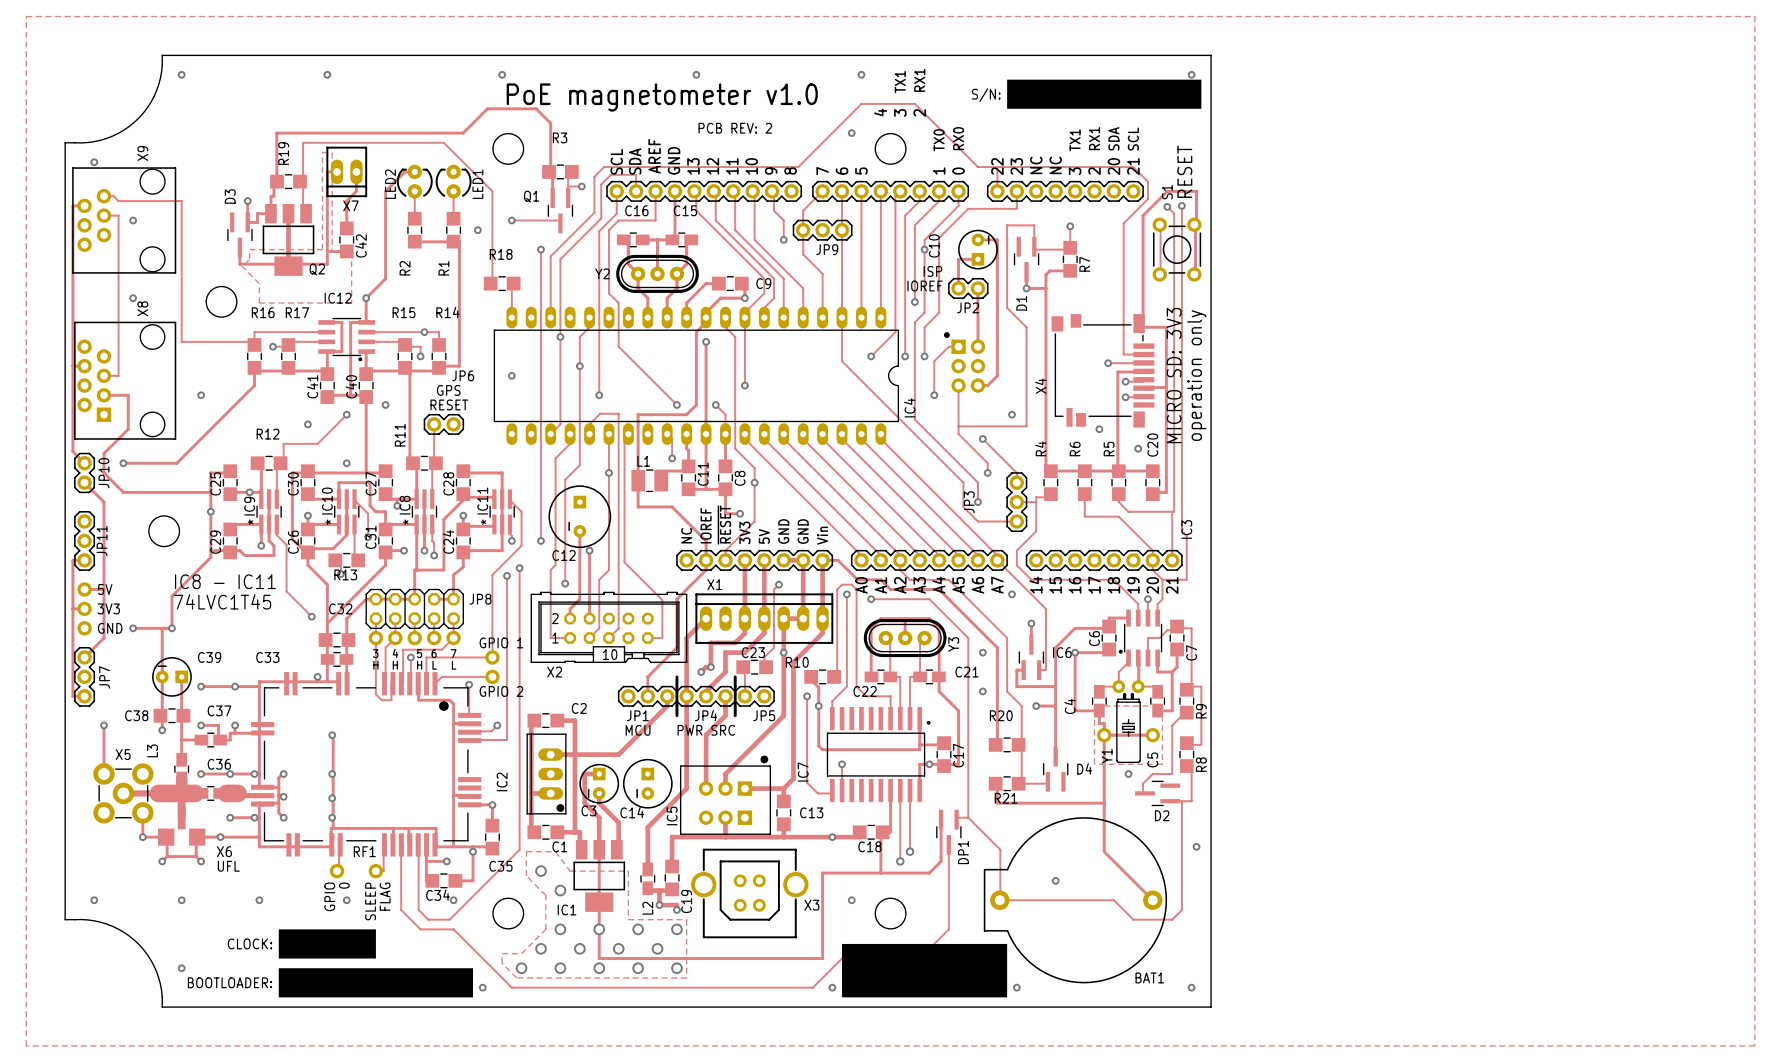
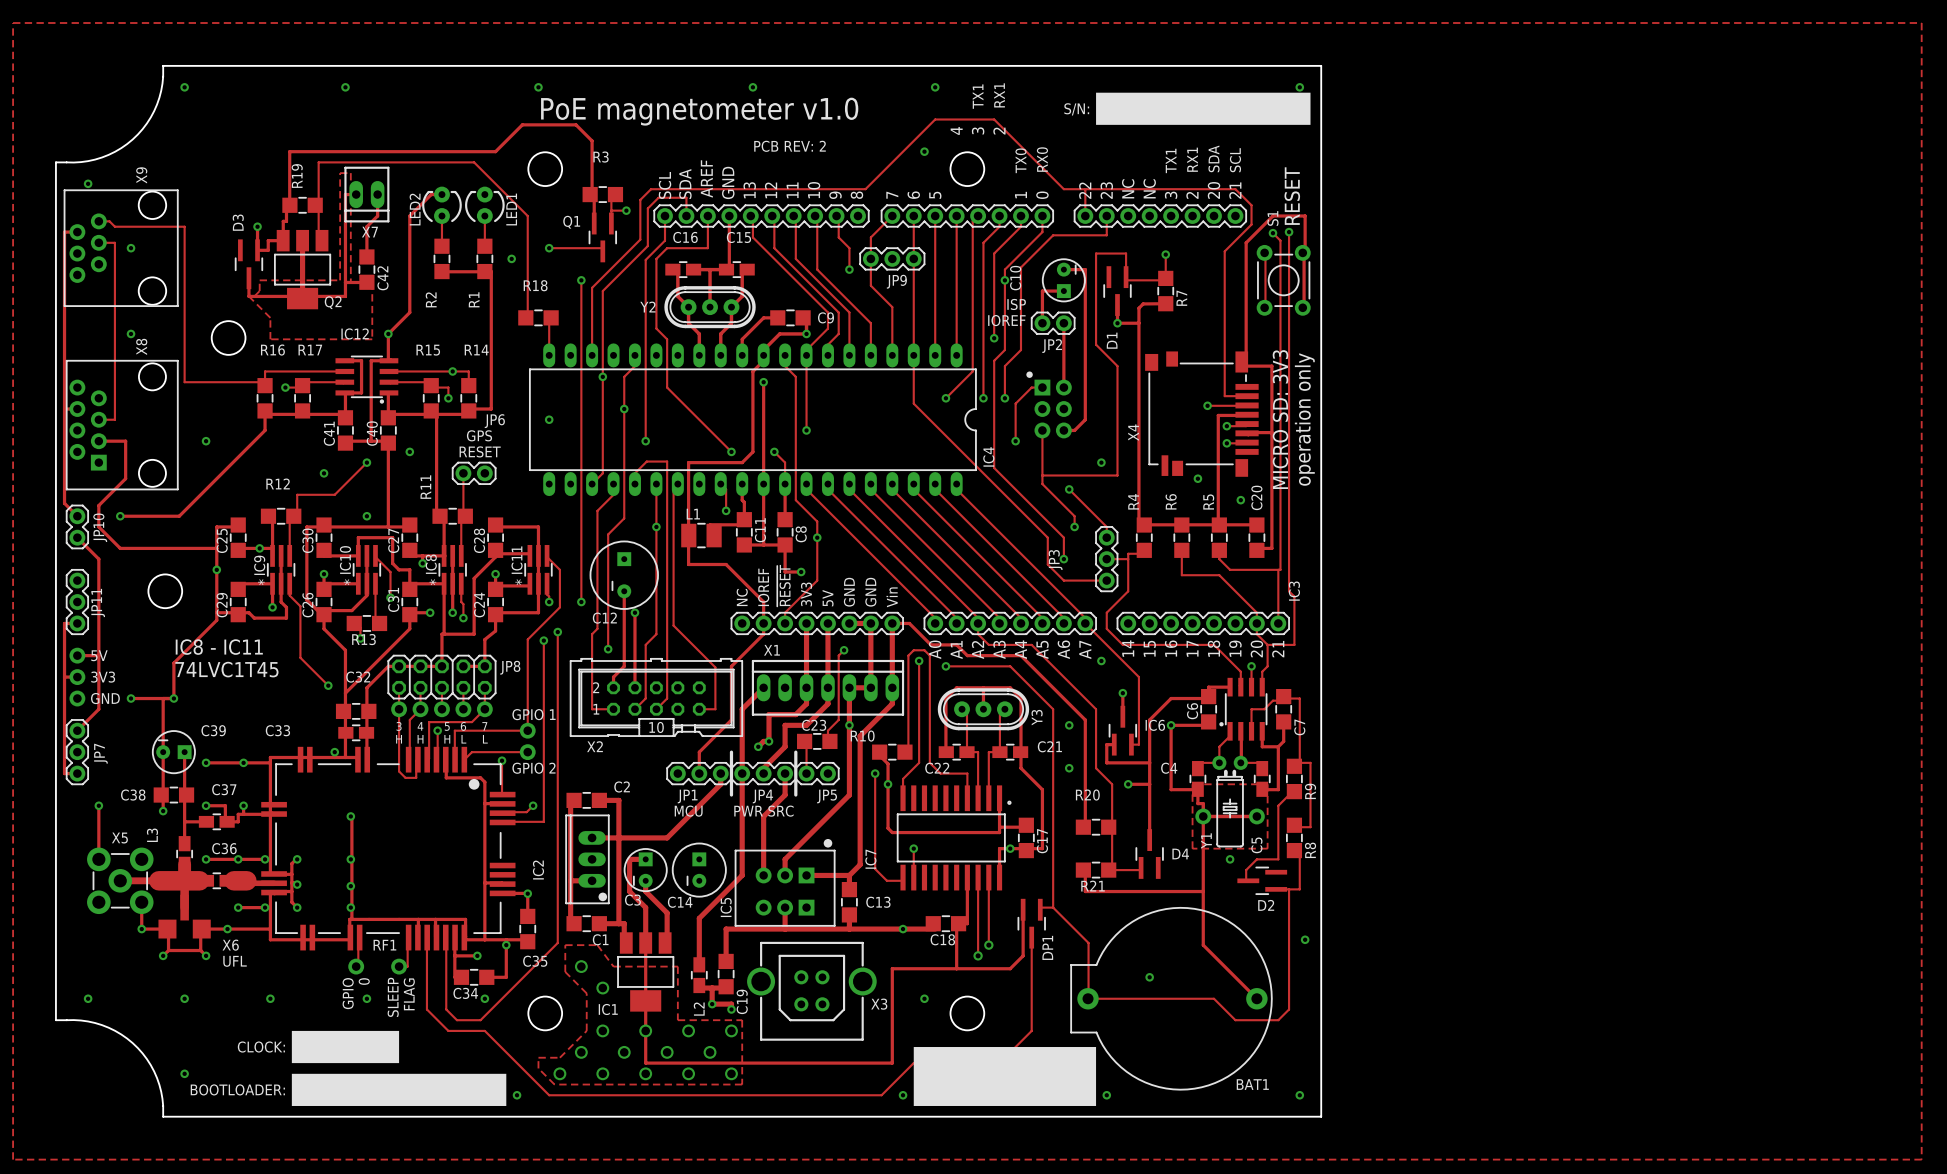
C4 name rotation: 0° (1070, 706) -> 90° clockwise (1169, 768)

